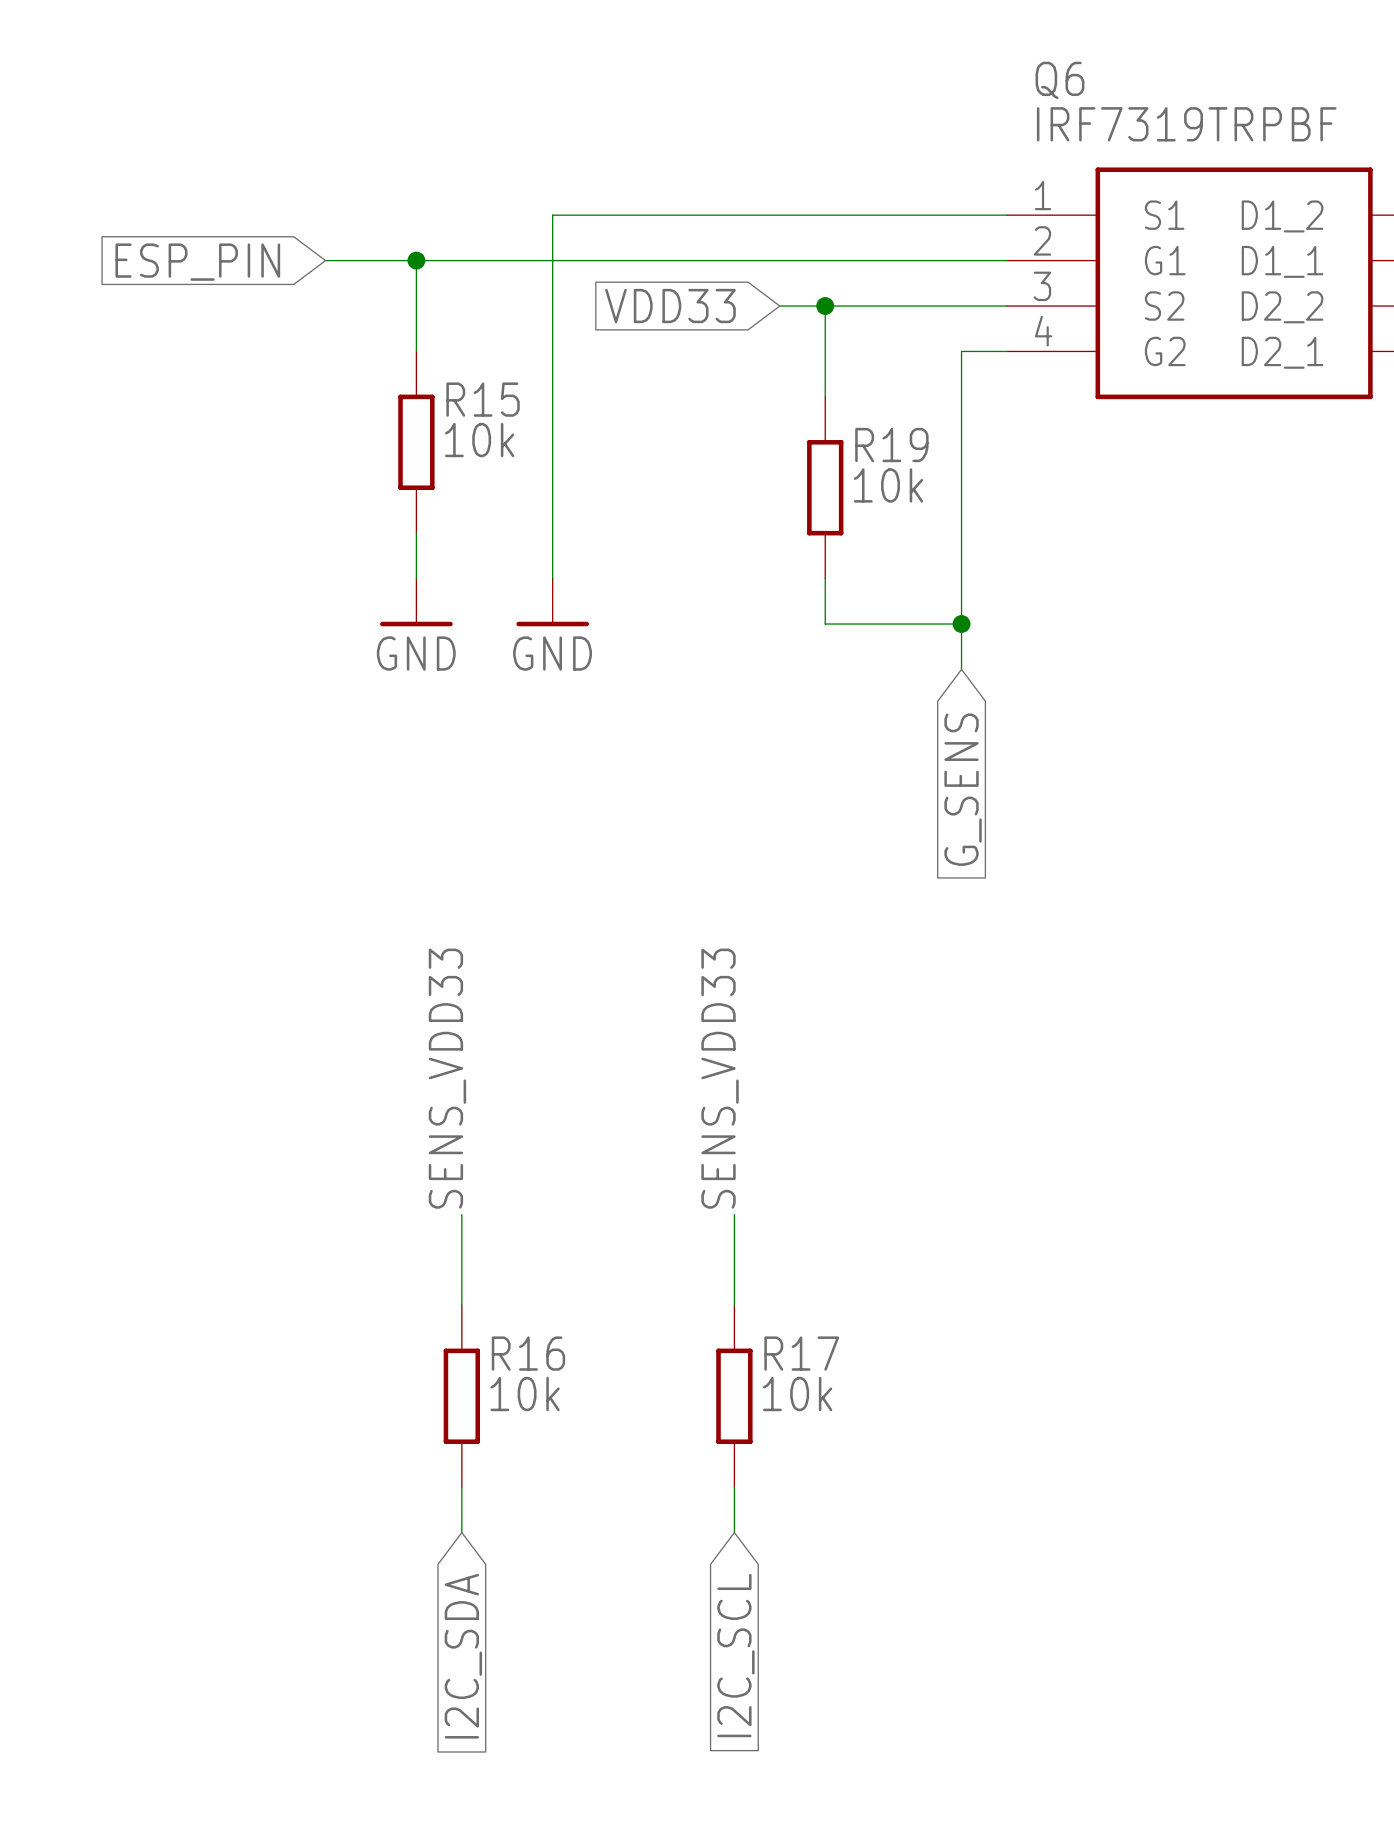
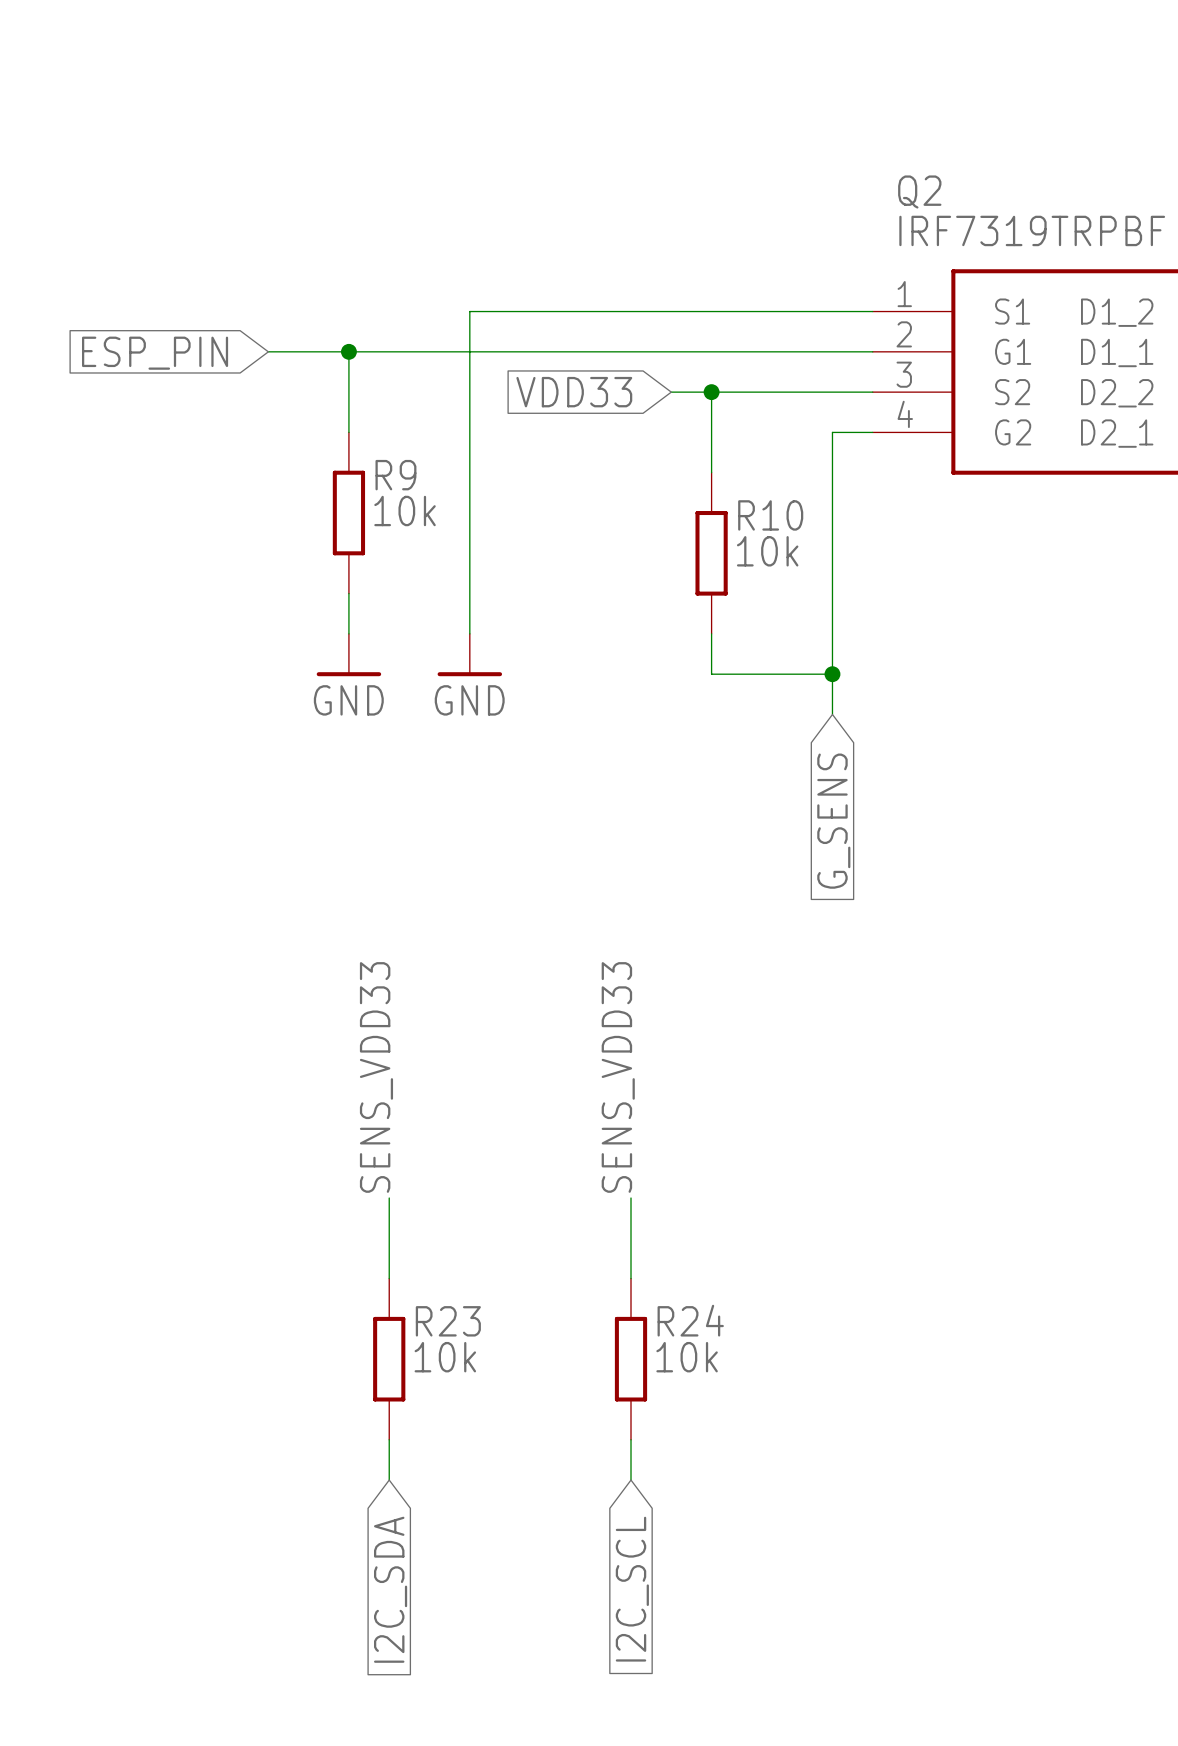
Q6 name: Q6 (1059, 80) -> Q2 (919, 192)
R15 name: R15 (483, 399) -> R9 (395, 475)
R19 name: R19 (891, 445) -> R10 (770, 515)
R16 name: R16 (528, 1353) -> R23 (448, 1321)
R17 name: R17 (801, 1353) -> R24 (690, 1320)

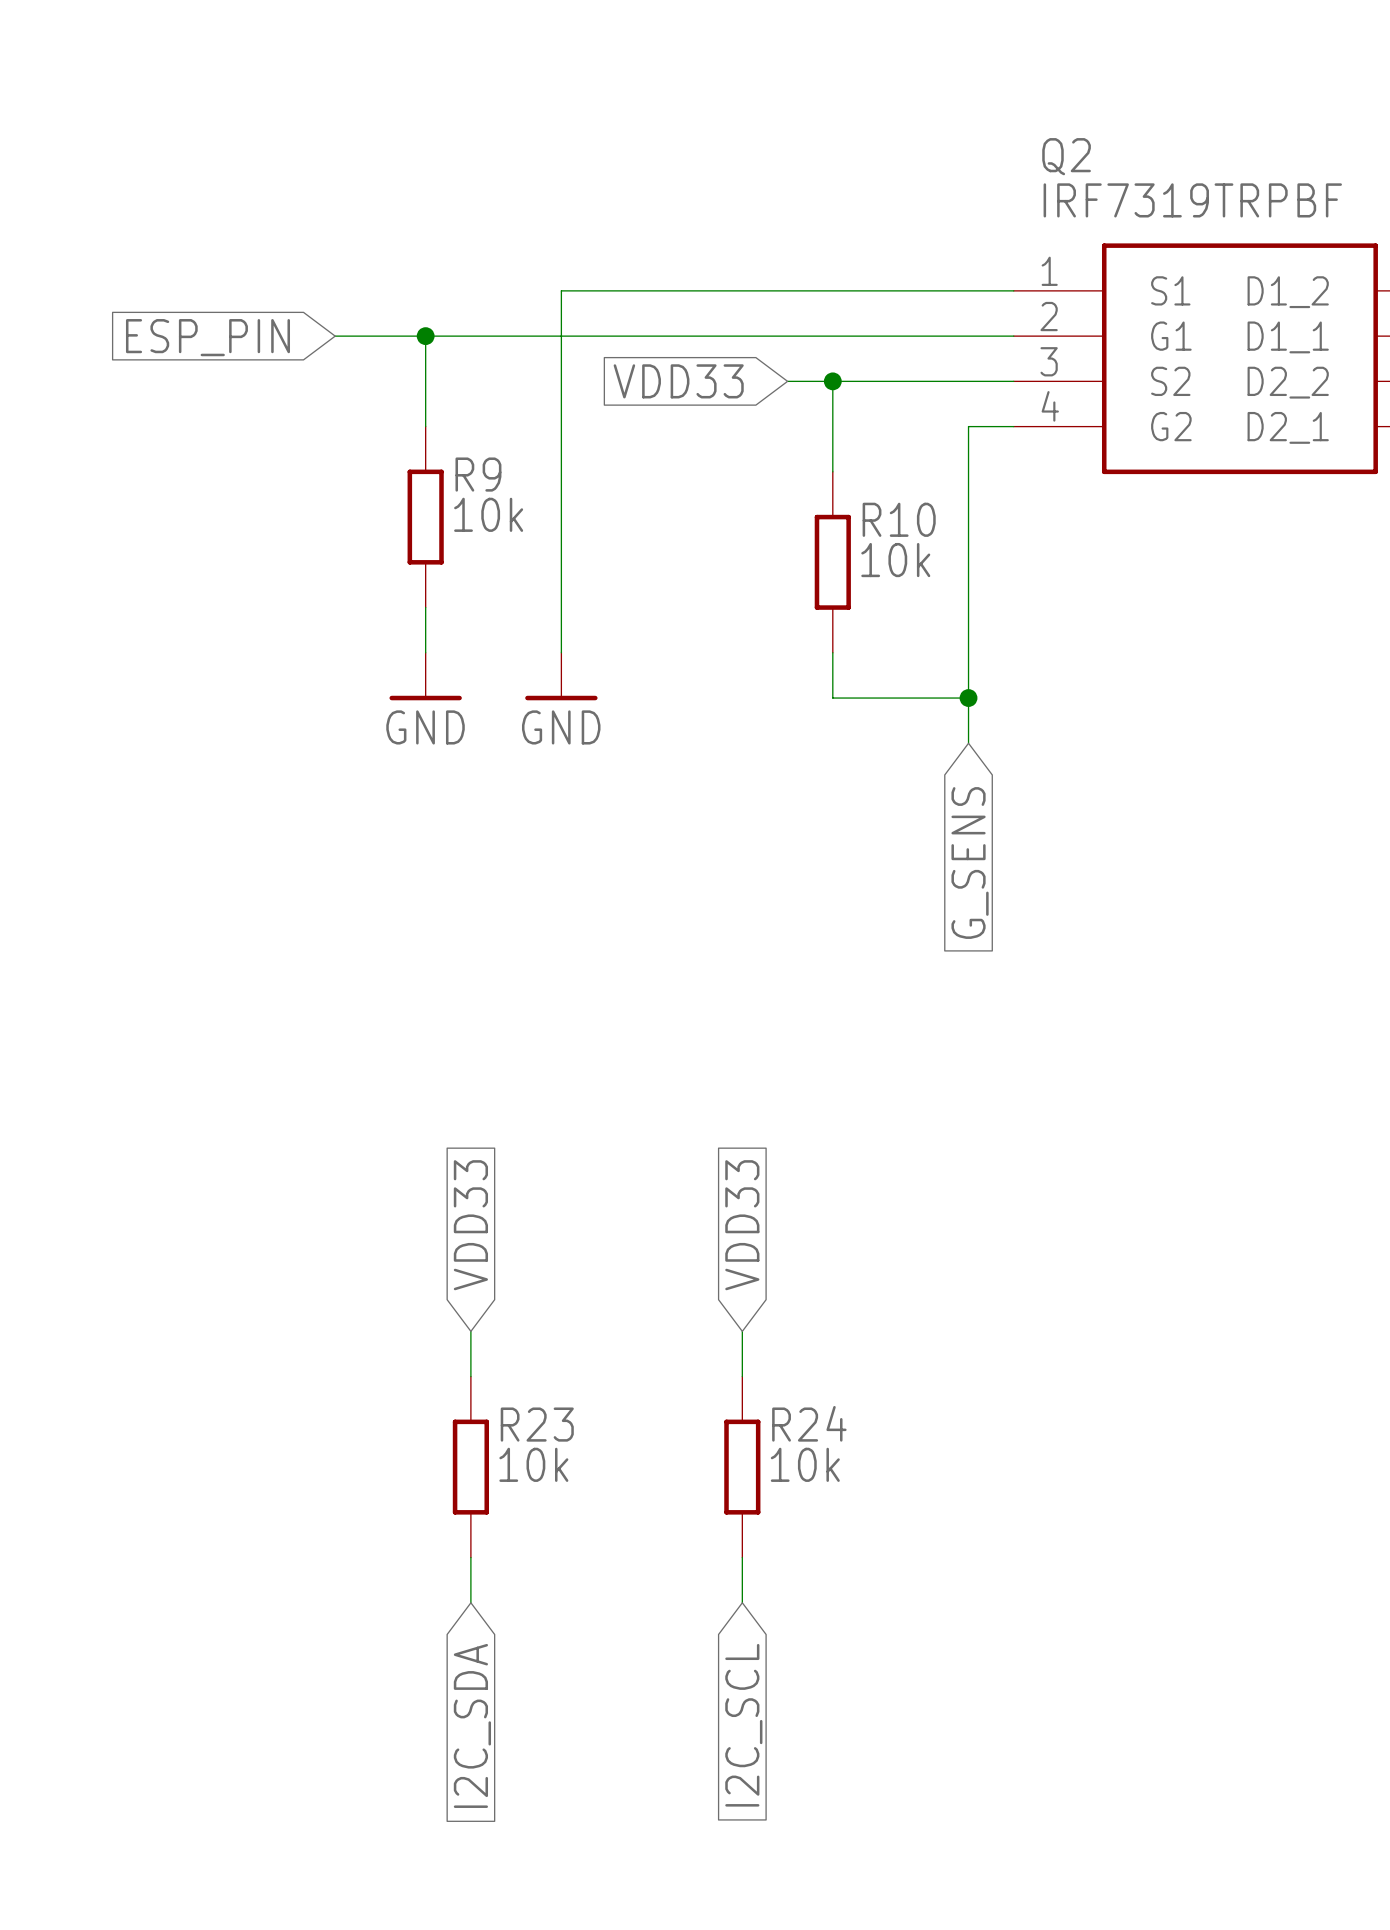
label: SENS_VDD33 (376, 1077) -> none
label: SENS_VDD33 (618, 1077) -> none
global label: none -> VDD33 (470, 1225)
global label: none -> VDD33 (742, 1225)
wire: (389, 1198) (389, 1238) -> none
wire: (631, 1198) (631, 1238) -> none

